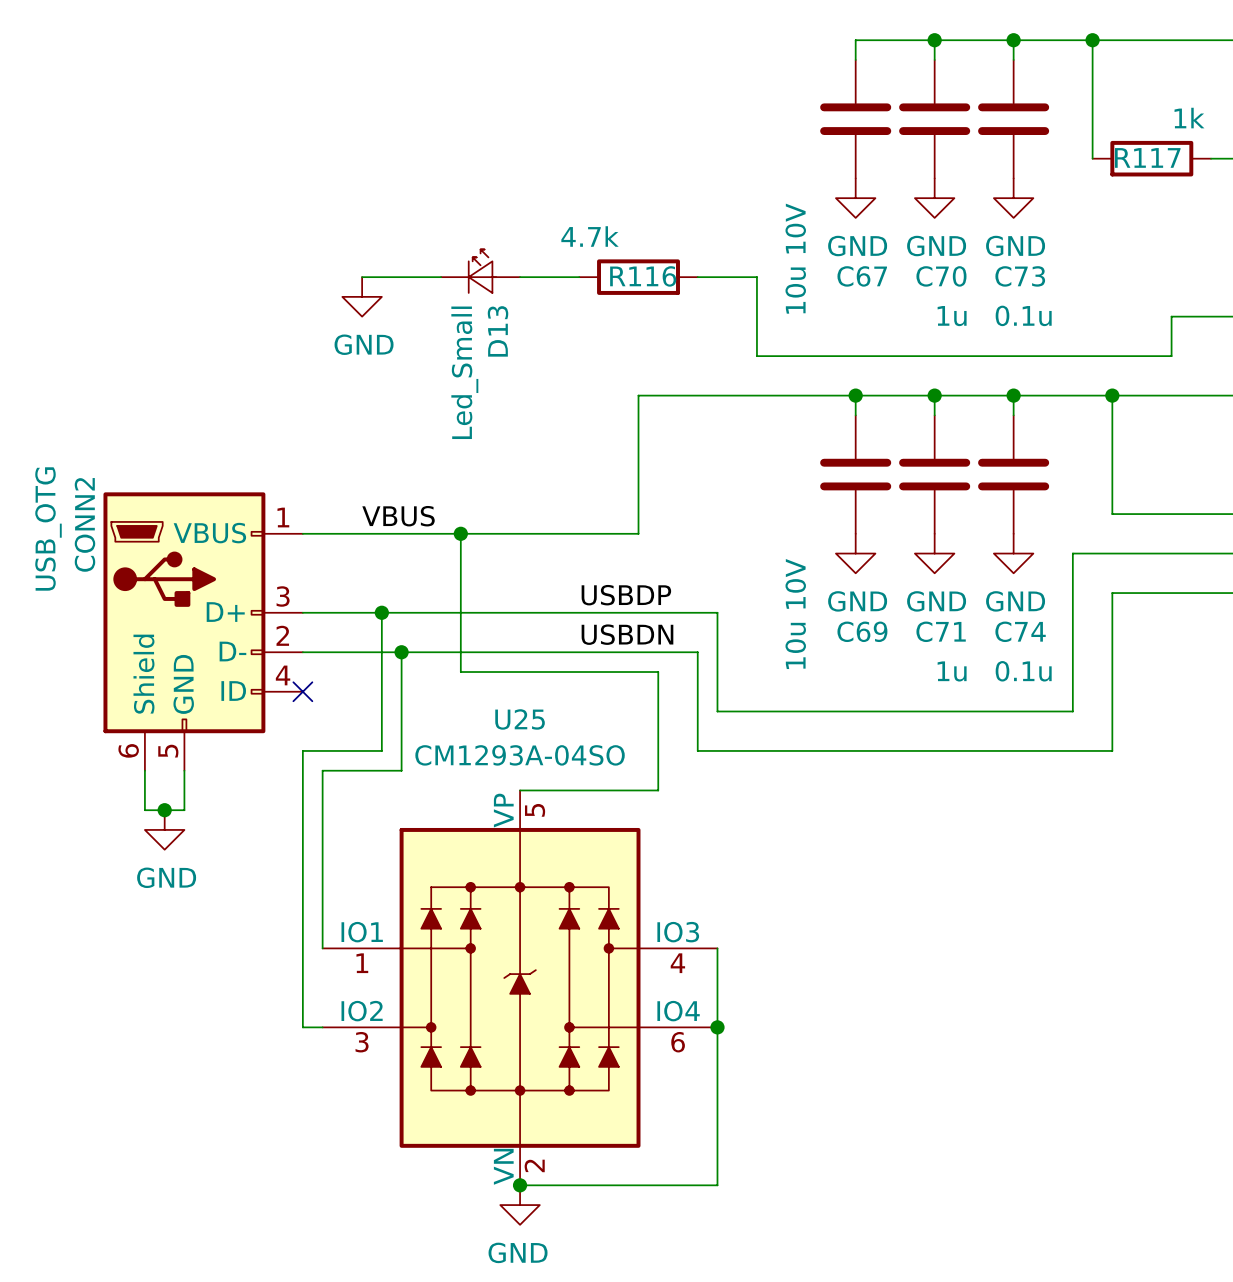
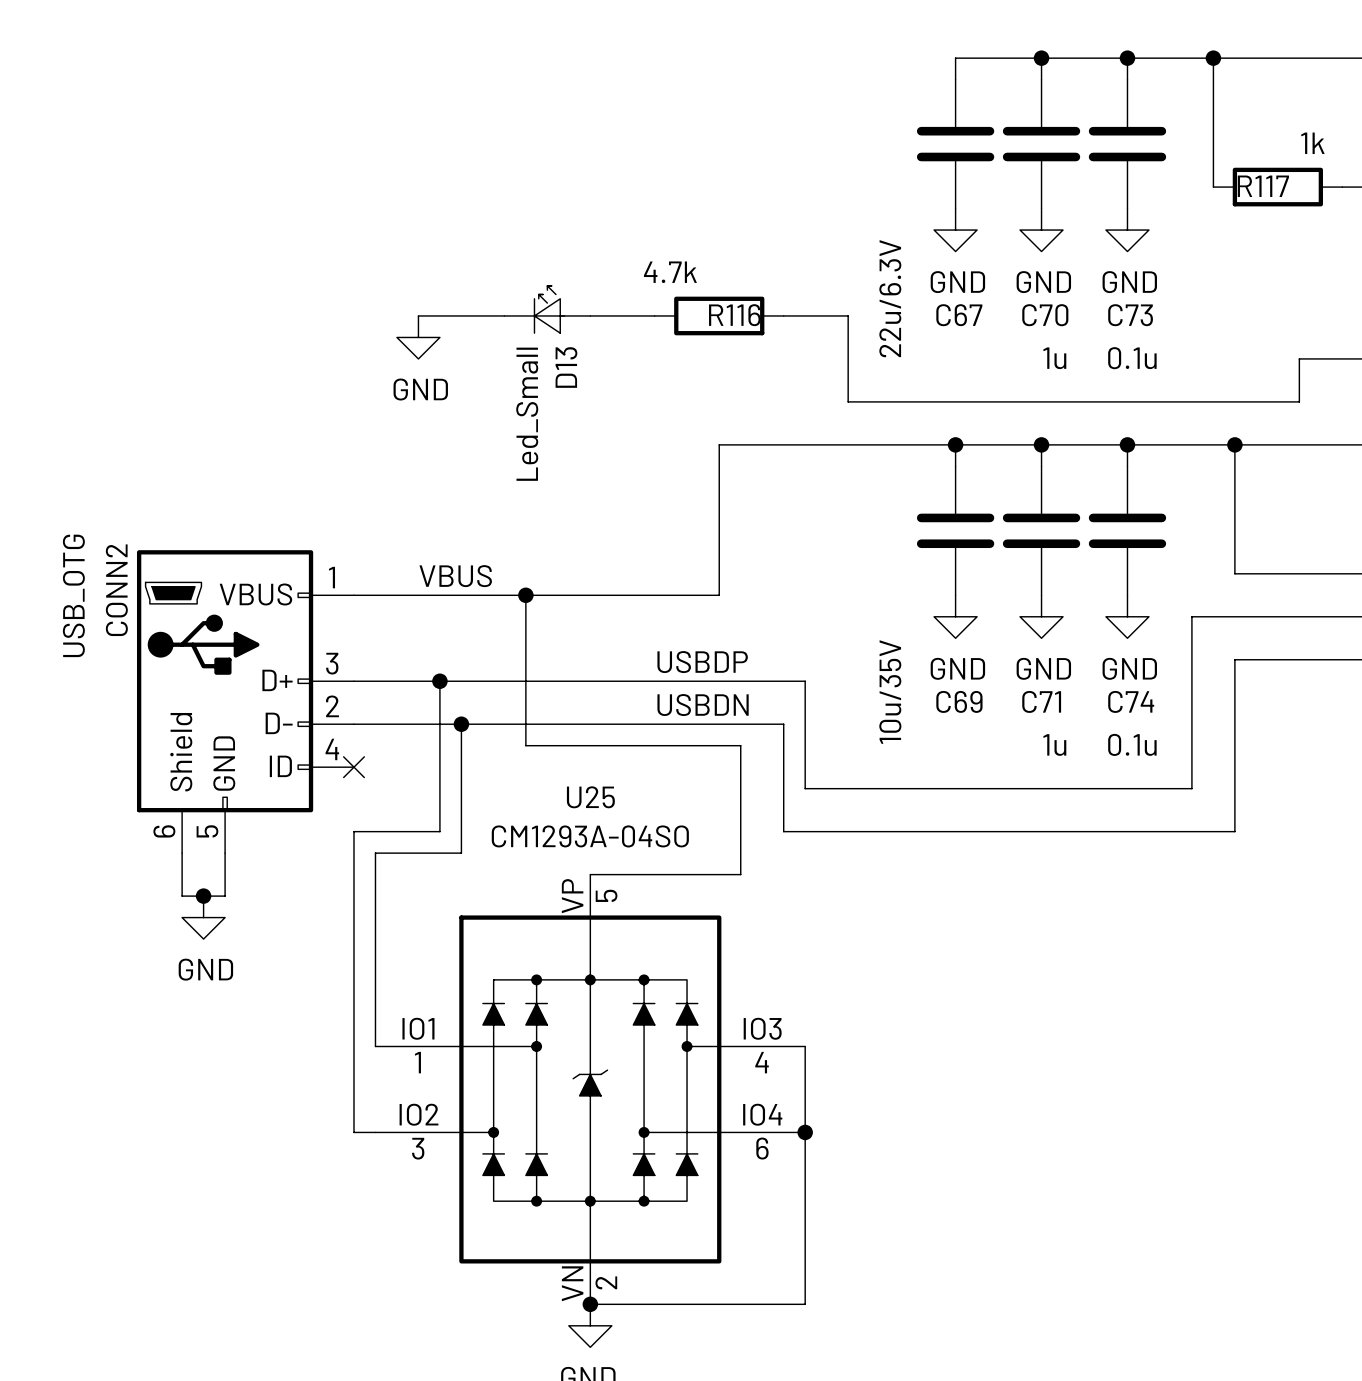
C67 value: 10u 10V (795, 258) -> 22u/6.3V (890, 298)
C69 value: 10u 10V (795, 614) -> 10u/35V (890, 692)

